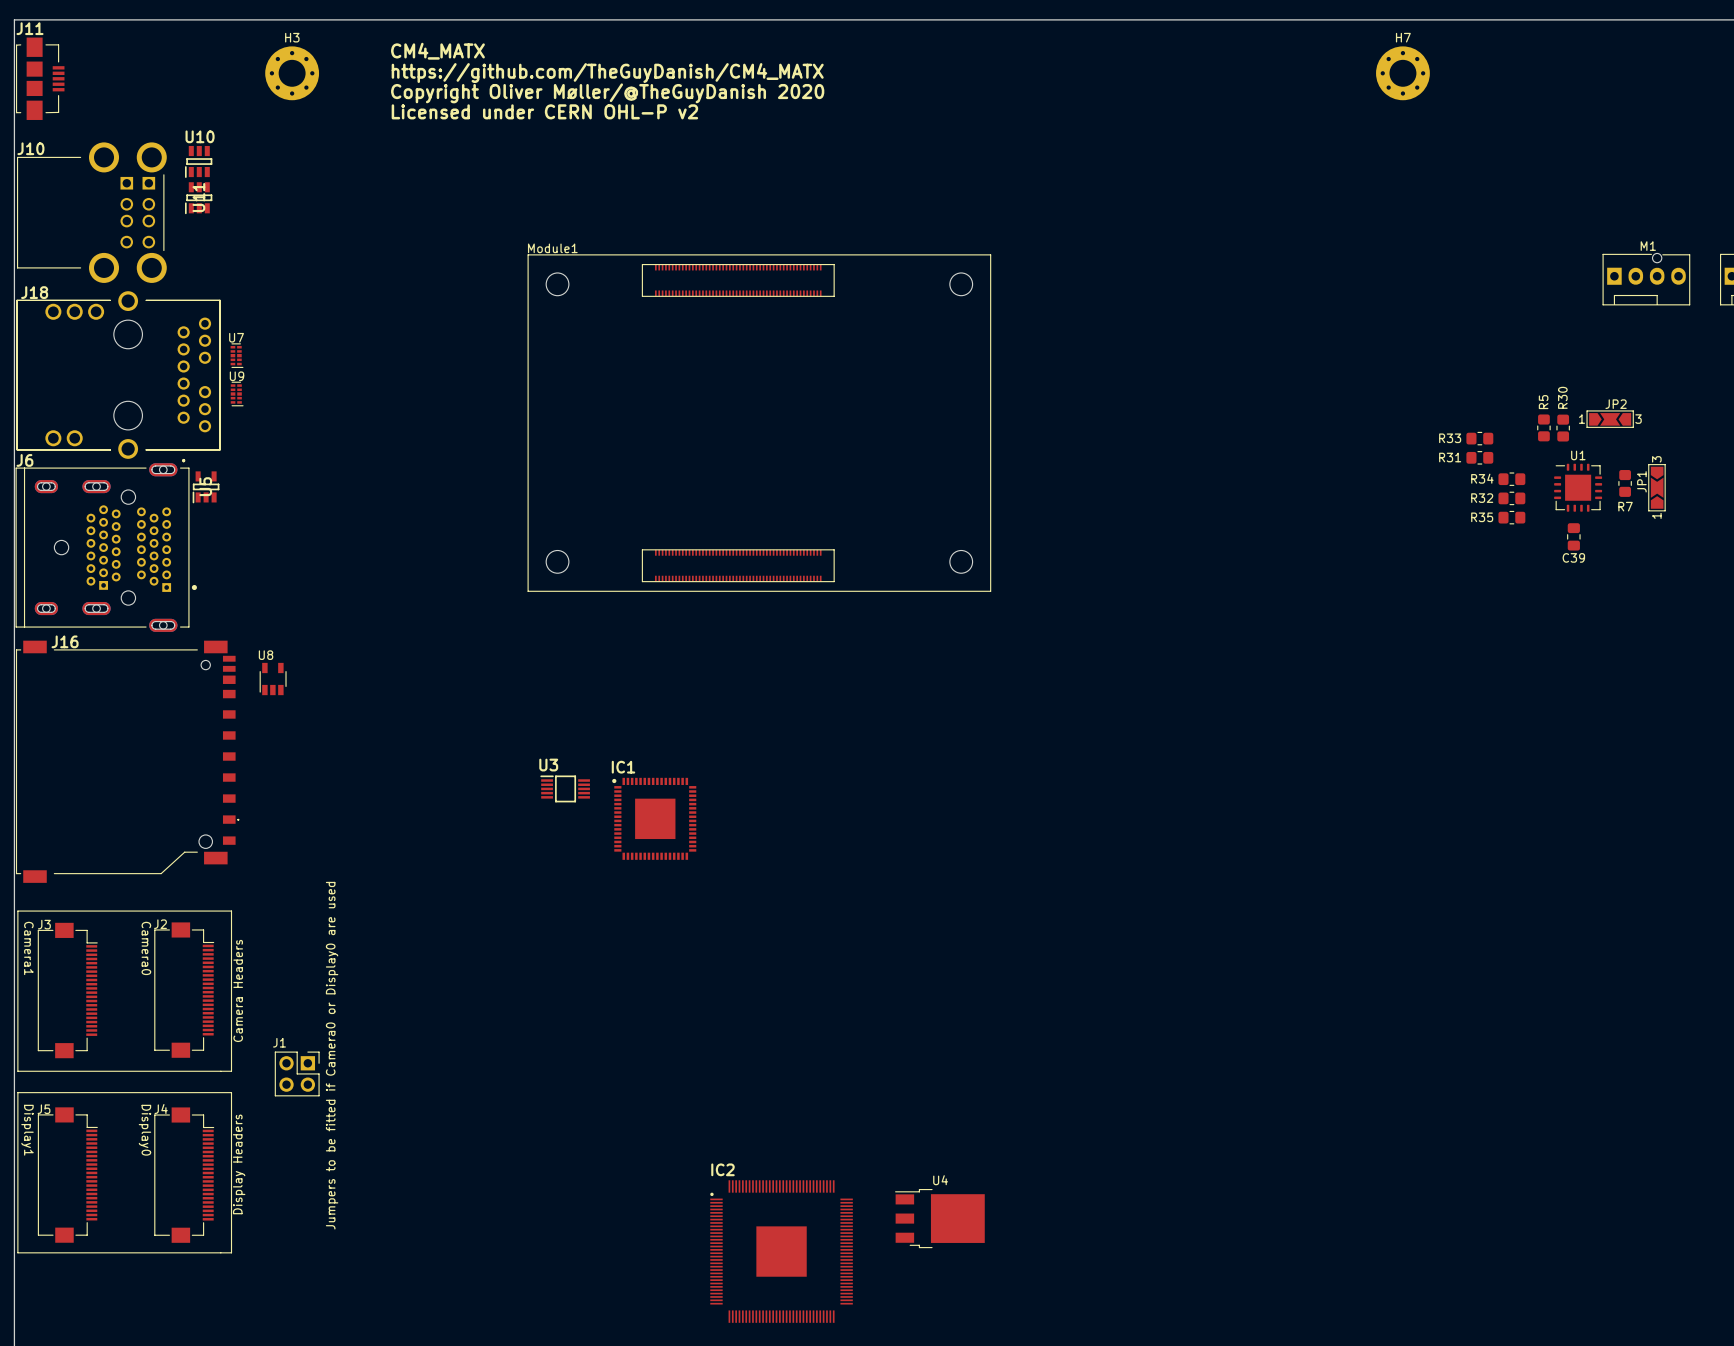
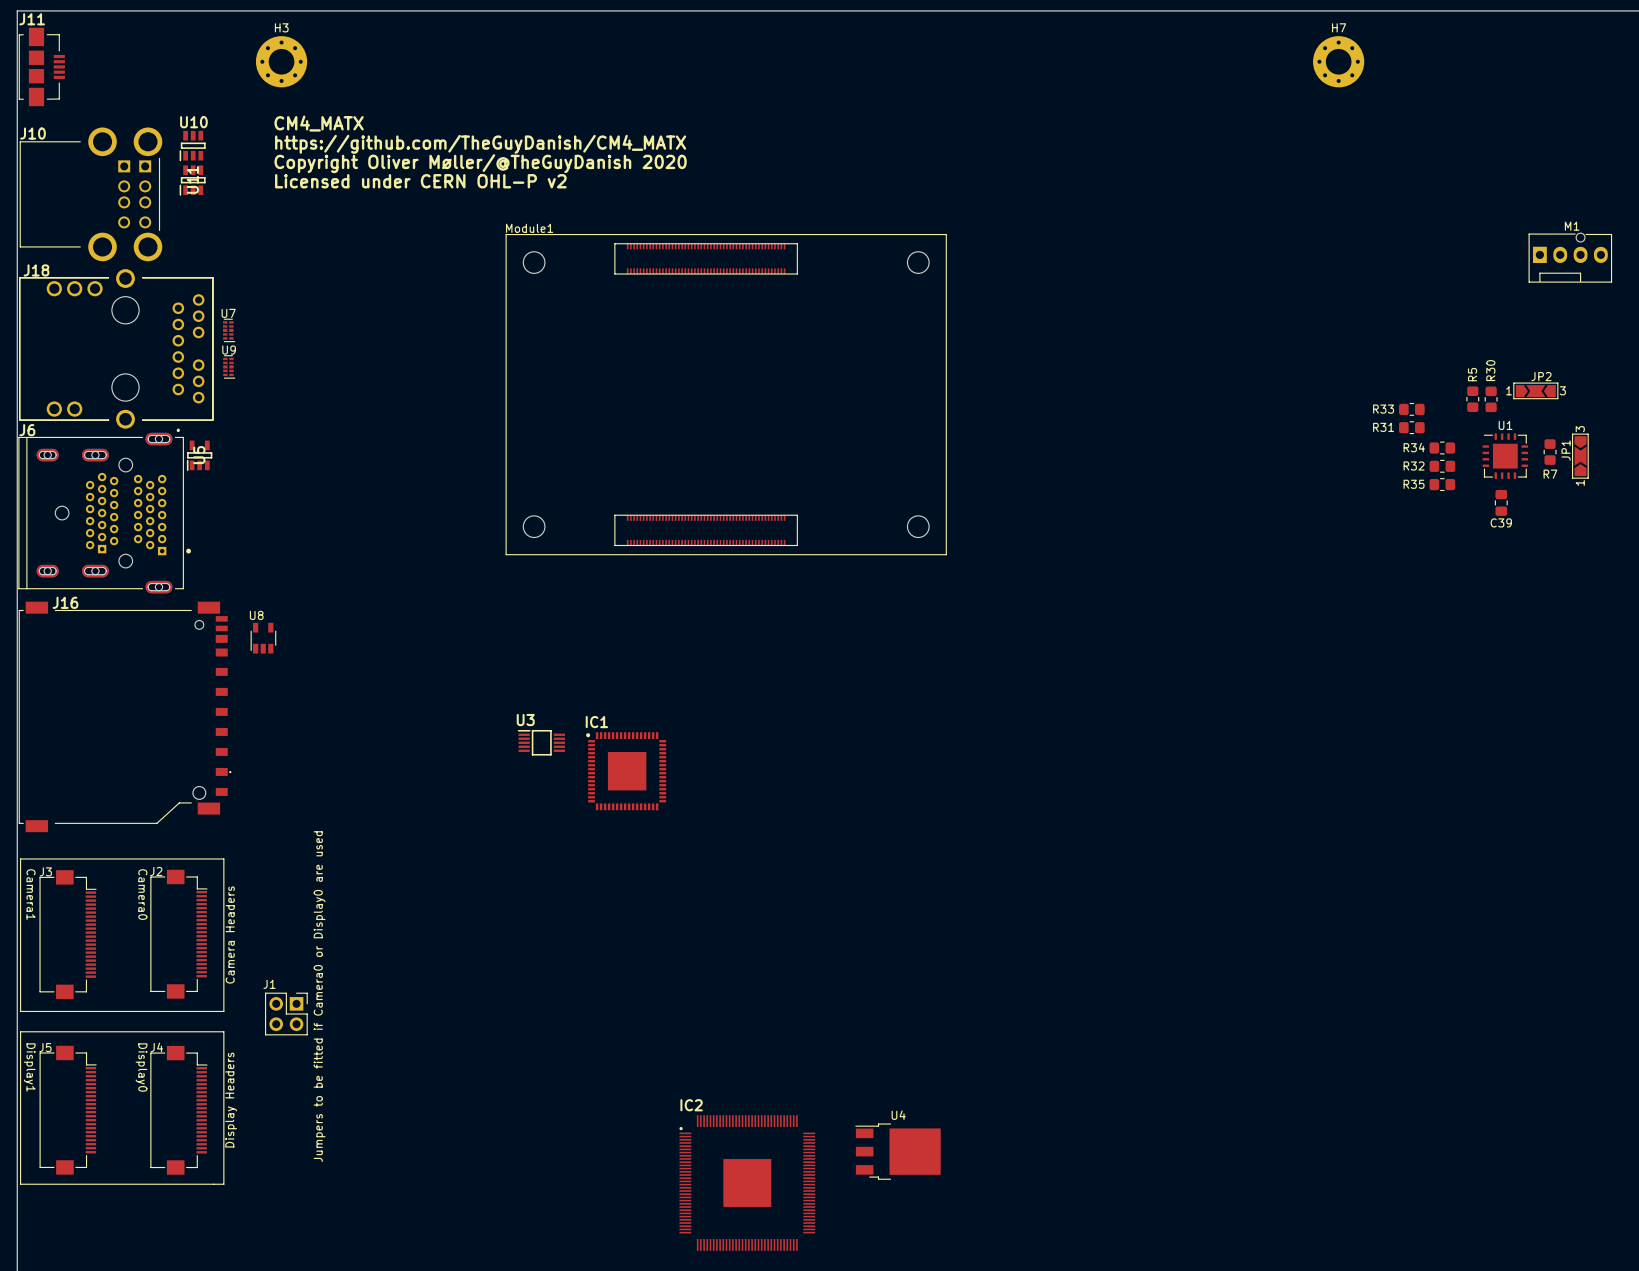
text position: CM4_MATX (437, 51) -> CM4_MATX (319, 123)
text position: https://github.com/TheGuyDanish/CM4_MATX (607, 73) -> https://github.com/TheGuyDanish/CM4_MATX (480, 144)
text position: Copyright Oliver Møller/@TheGuyDanish 2020 (607, 93) -> Copyright Oliver Møller/@TheGuyDanish 2020 (480, 163)
text position: Licensed under CERN OHL-P v2 (544, 111) -> Licensed under CERN OHL-P v2 (420, 181)

